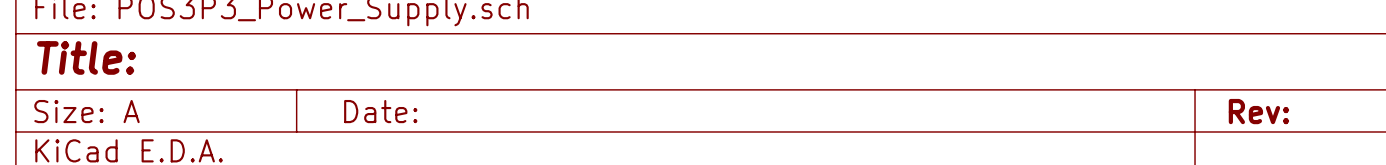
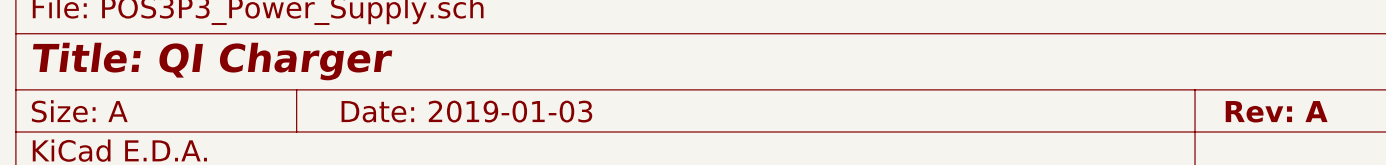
title block: Title: (86, 57) -> Title: QI Charger (212, 61)
title block: Date: (380, 111) -> Date: 2019-01-03 (466, 111)
title block: Rev: (1258, 111) -> Rev: A (1276, 111)

